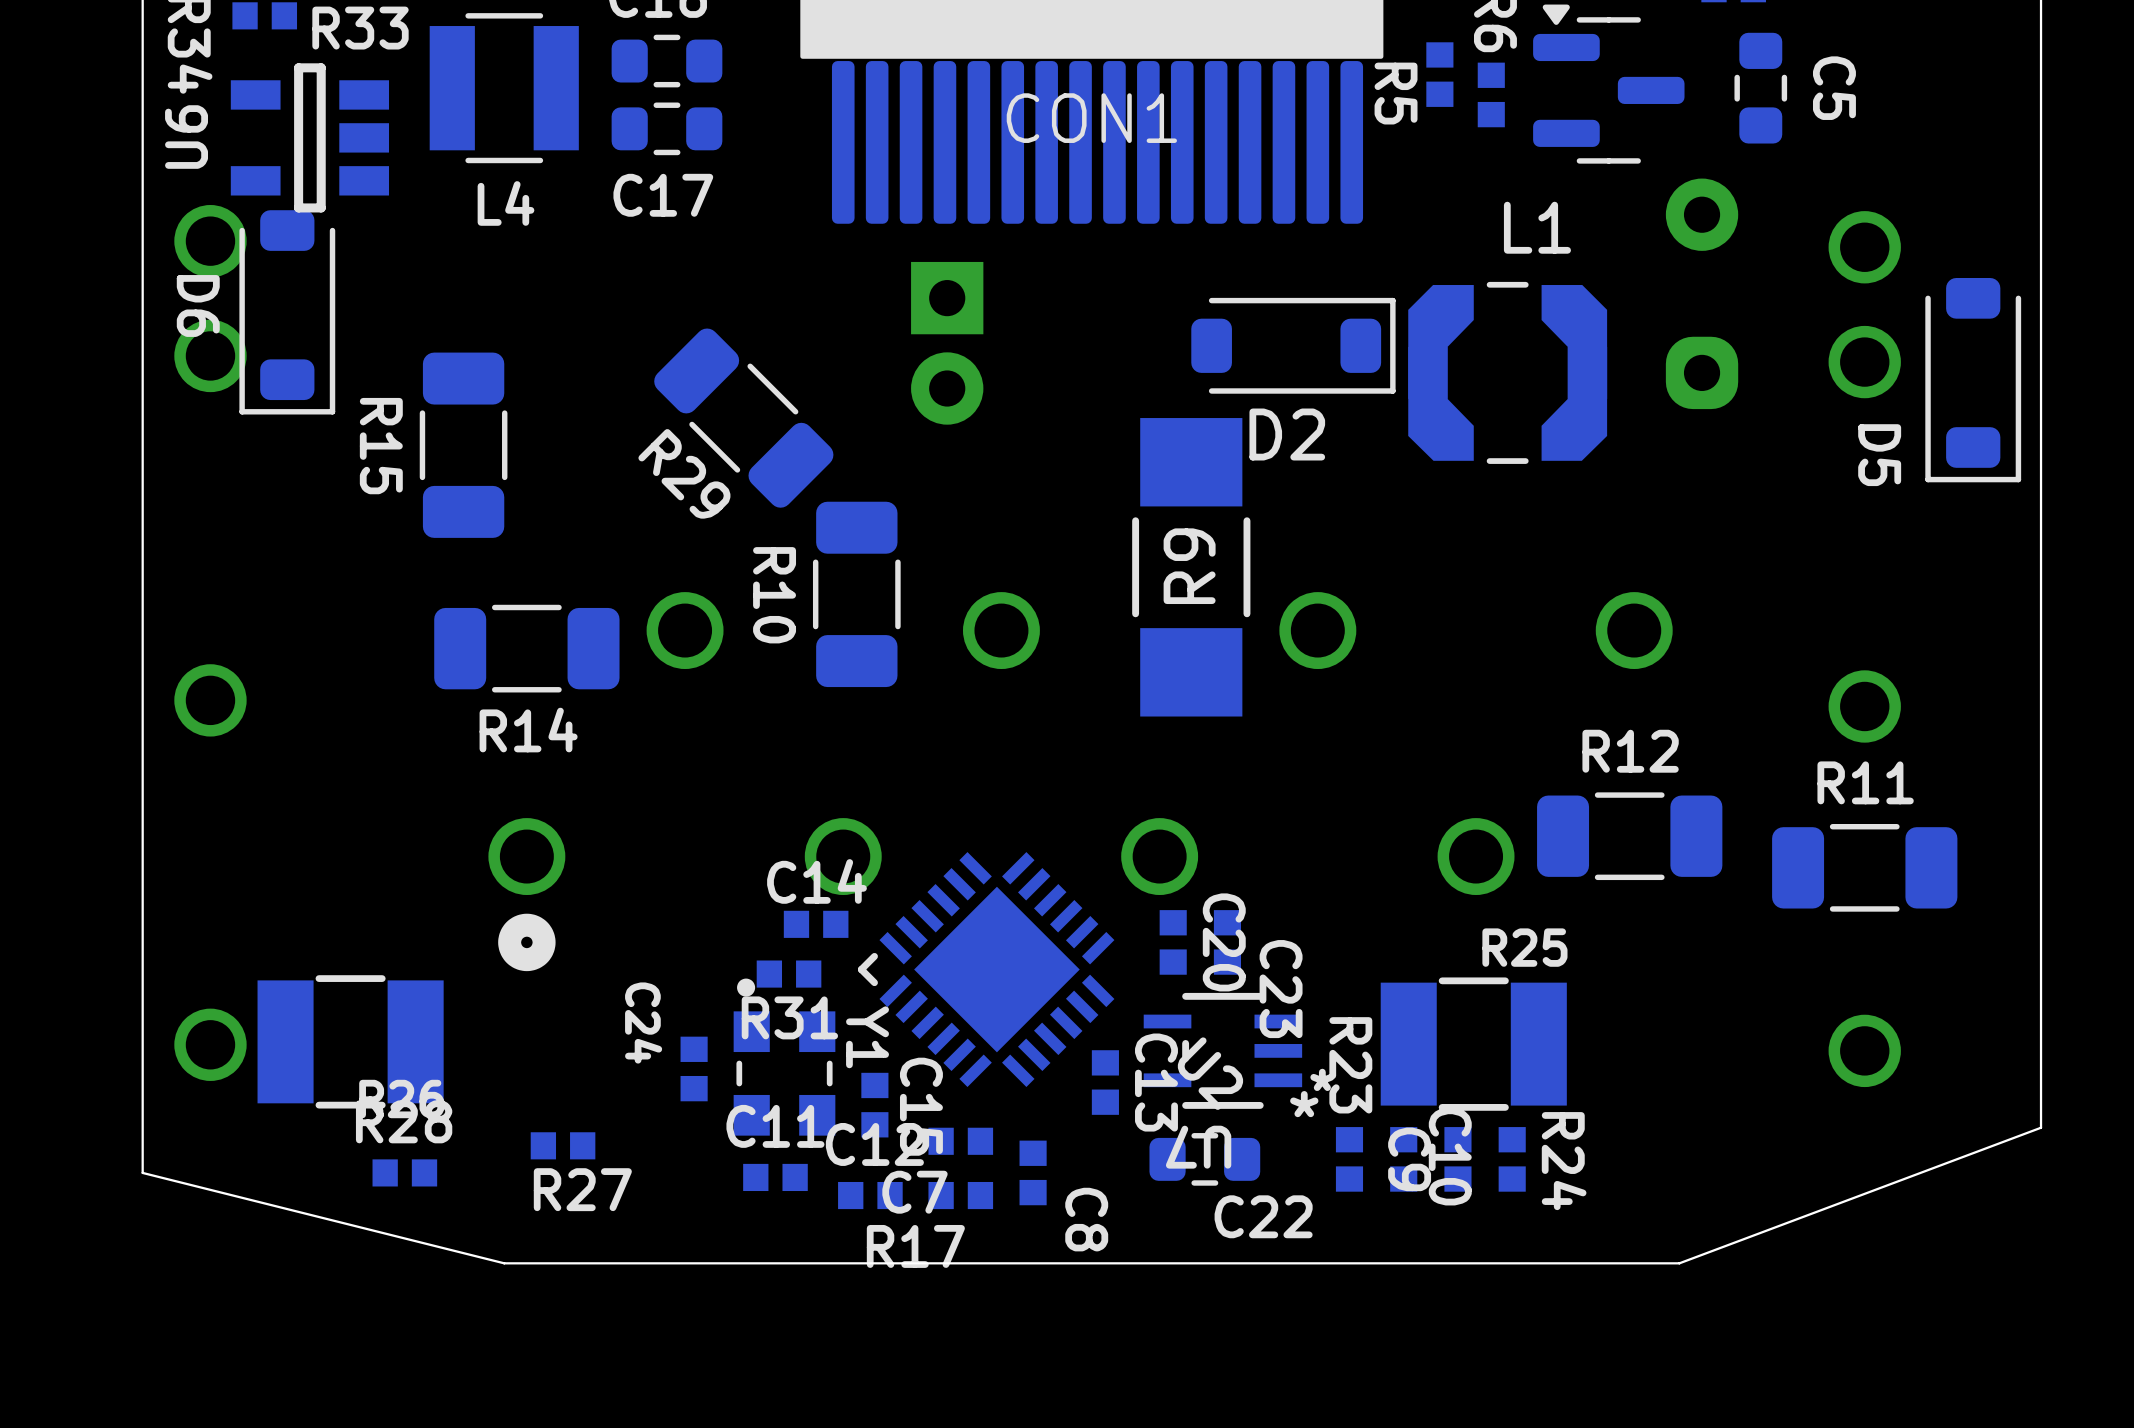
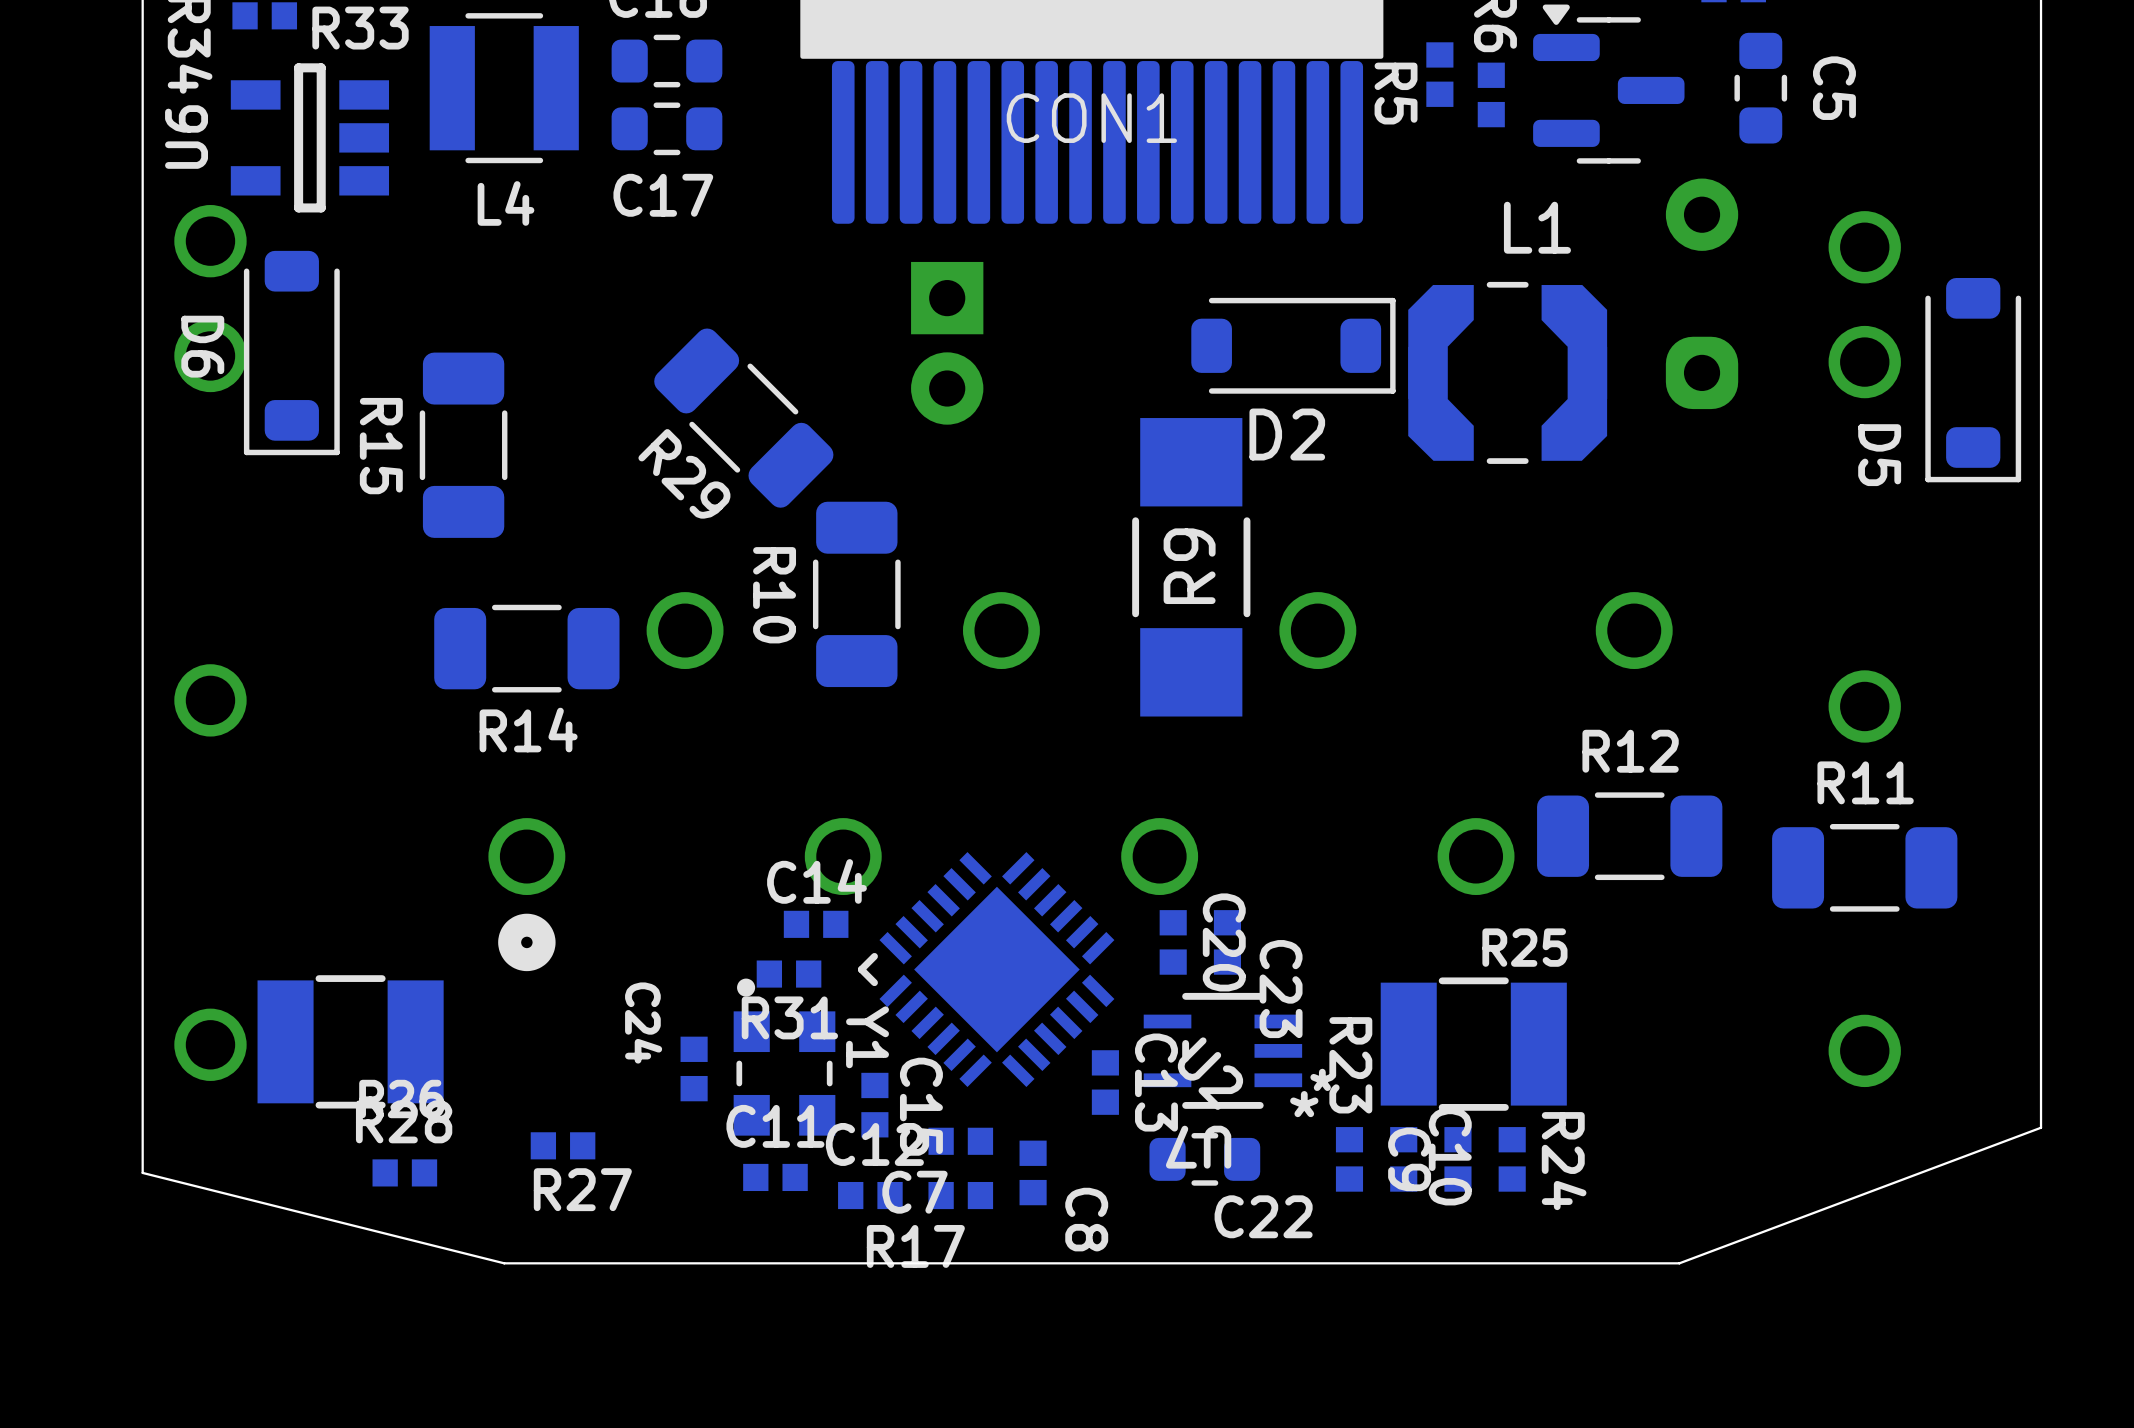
D6 position: (287, 312) -> (291, 353)

